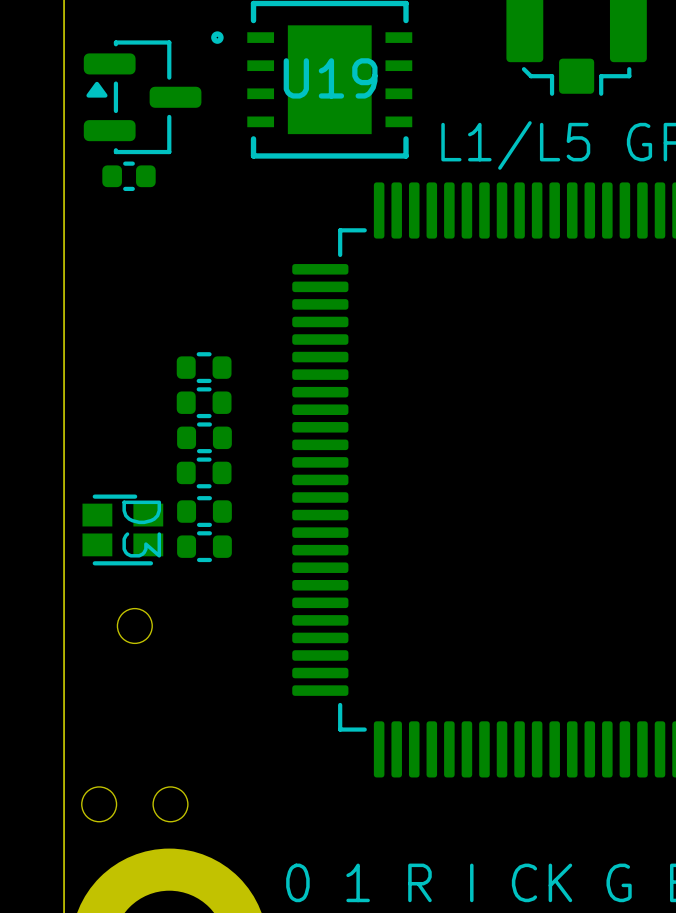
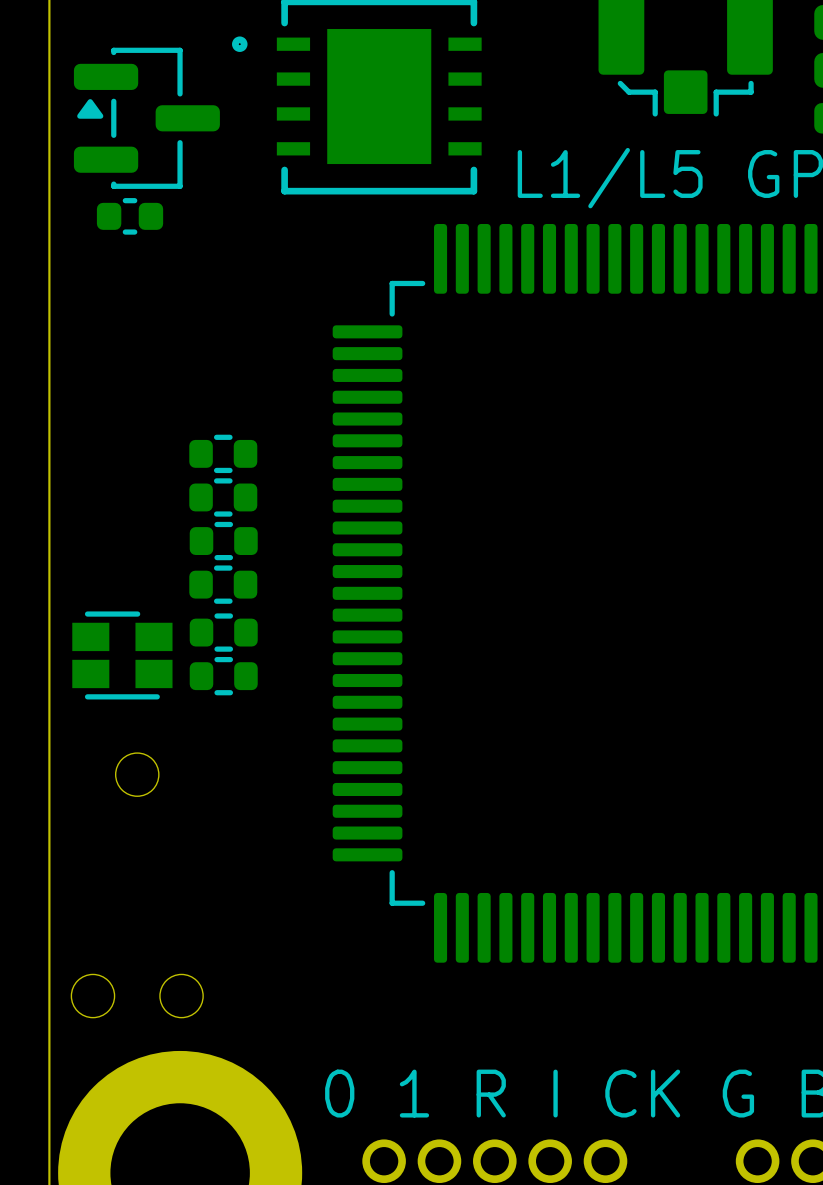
U19 name: U19 (330, 78) -> none
D3 name: D3 (141, 529) -> none

